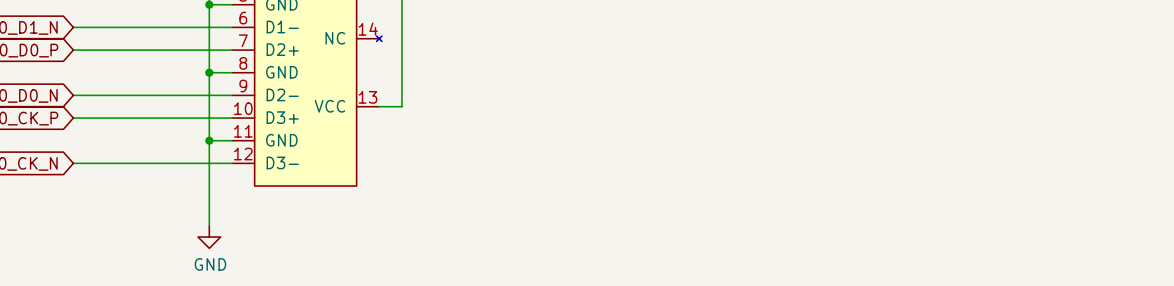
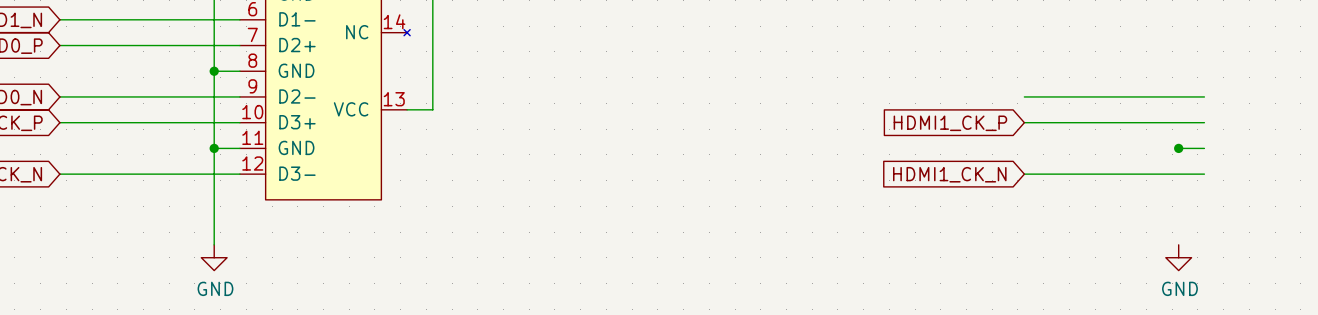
wire: none -> (1024, 96) (1204, 96)
global label: none -> HDMI1_CK_P (950, 123)
wire: none -> (1024, 122) (1204, 122)
wire: none -> (1178, 148) (1204, 148)
junction: none -> (1178, 148)
global label: none -> HDMI1_CK_N (949, 174)
wire: none -> (1024, 174) (1204, 174)
power symbol: none -> GND (1178, 257)

